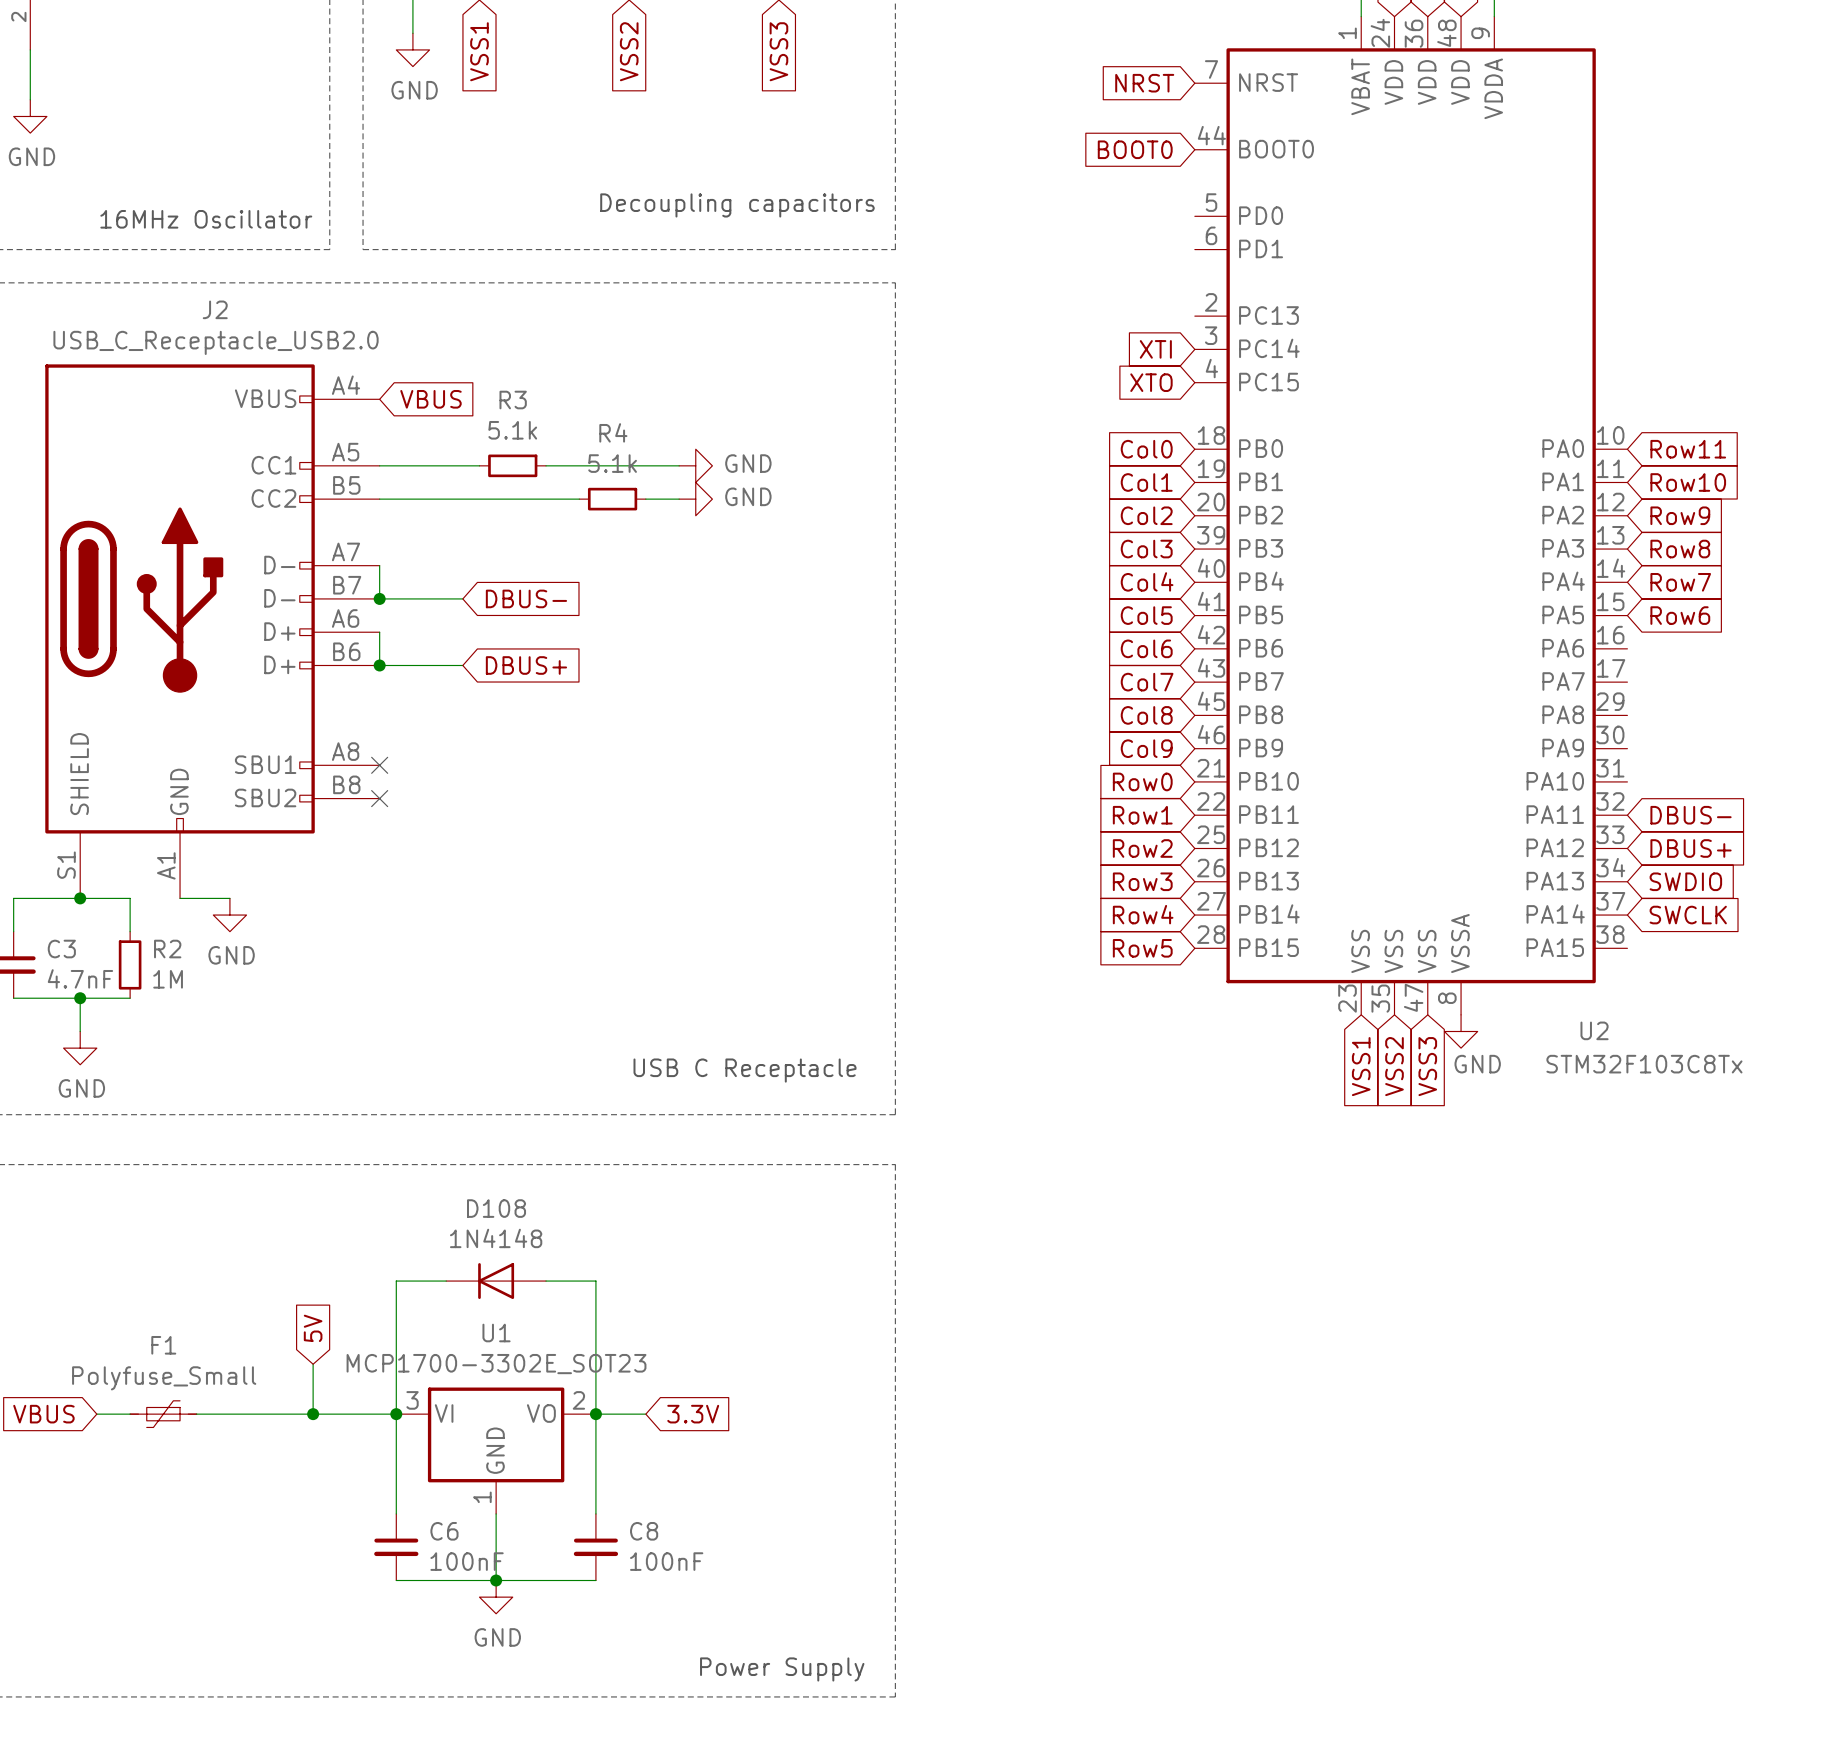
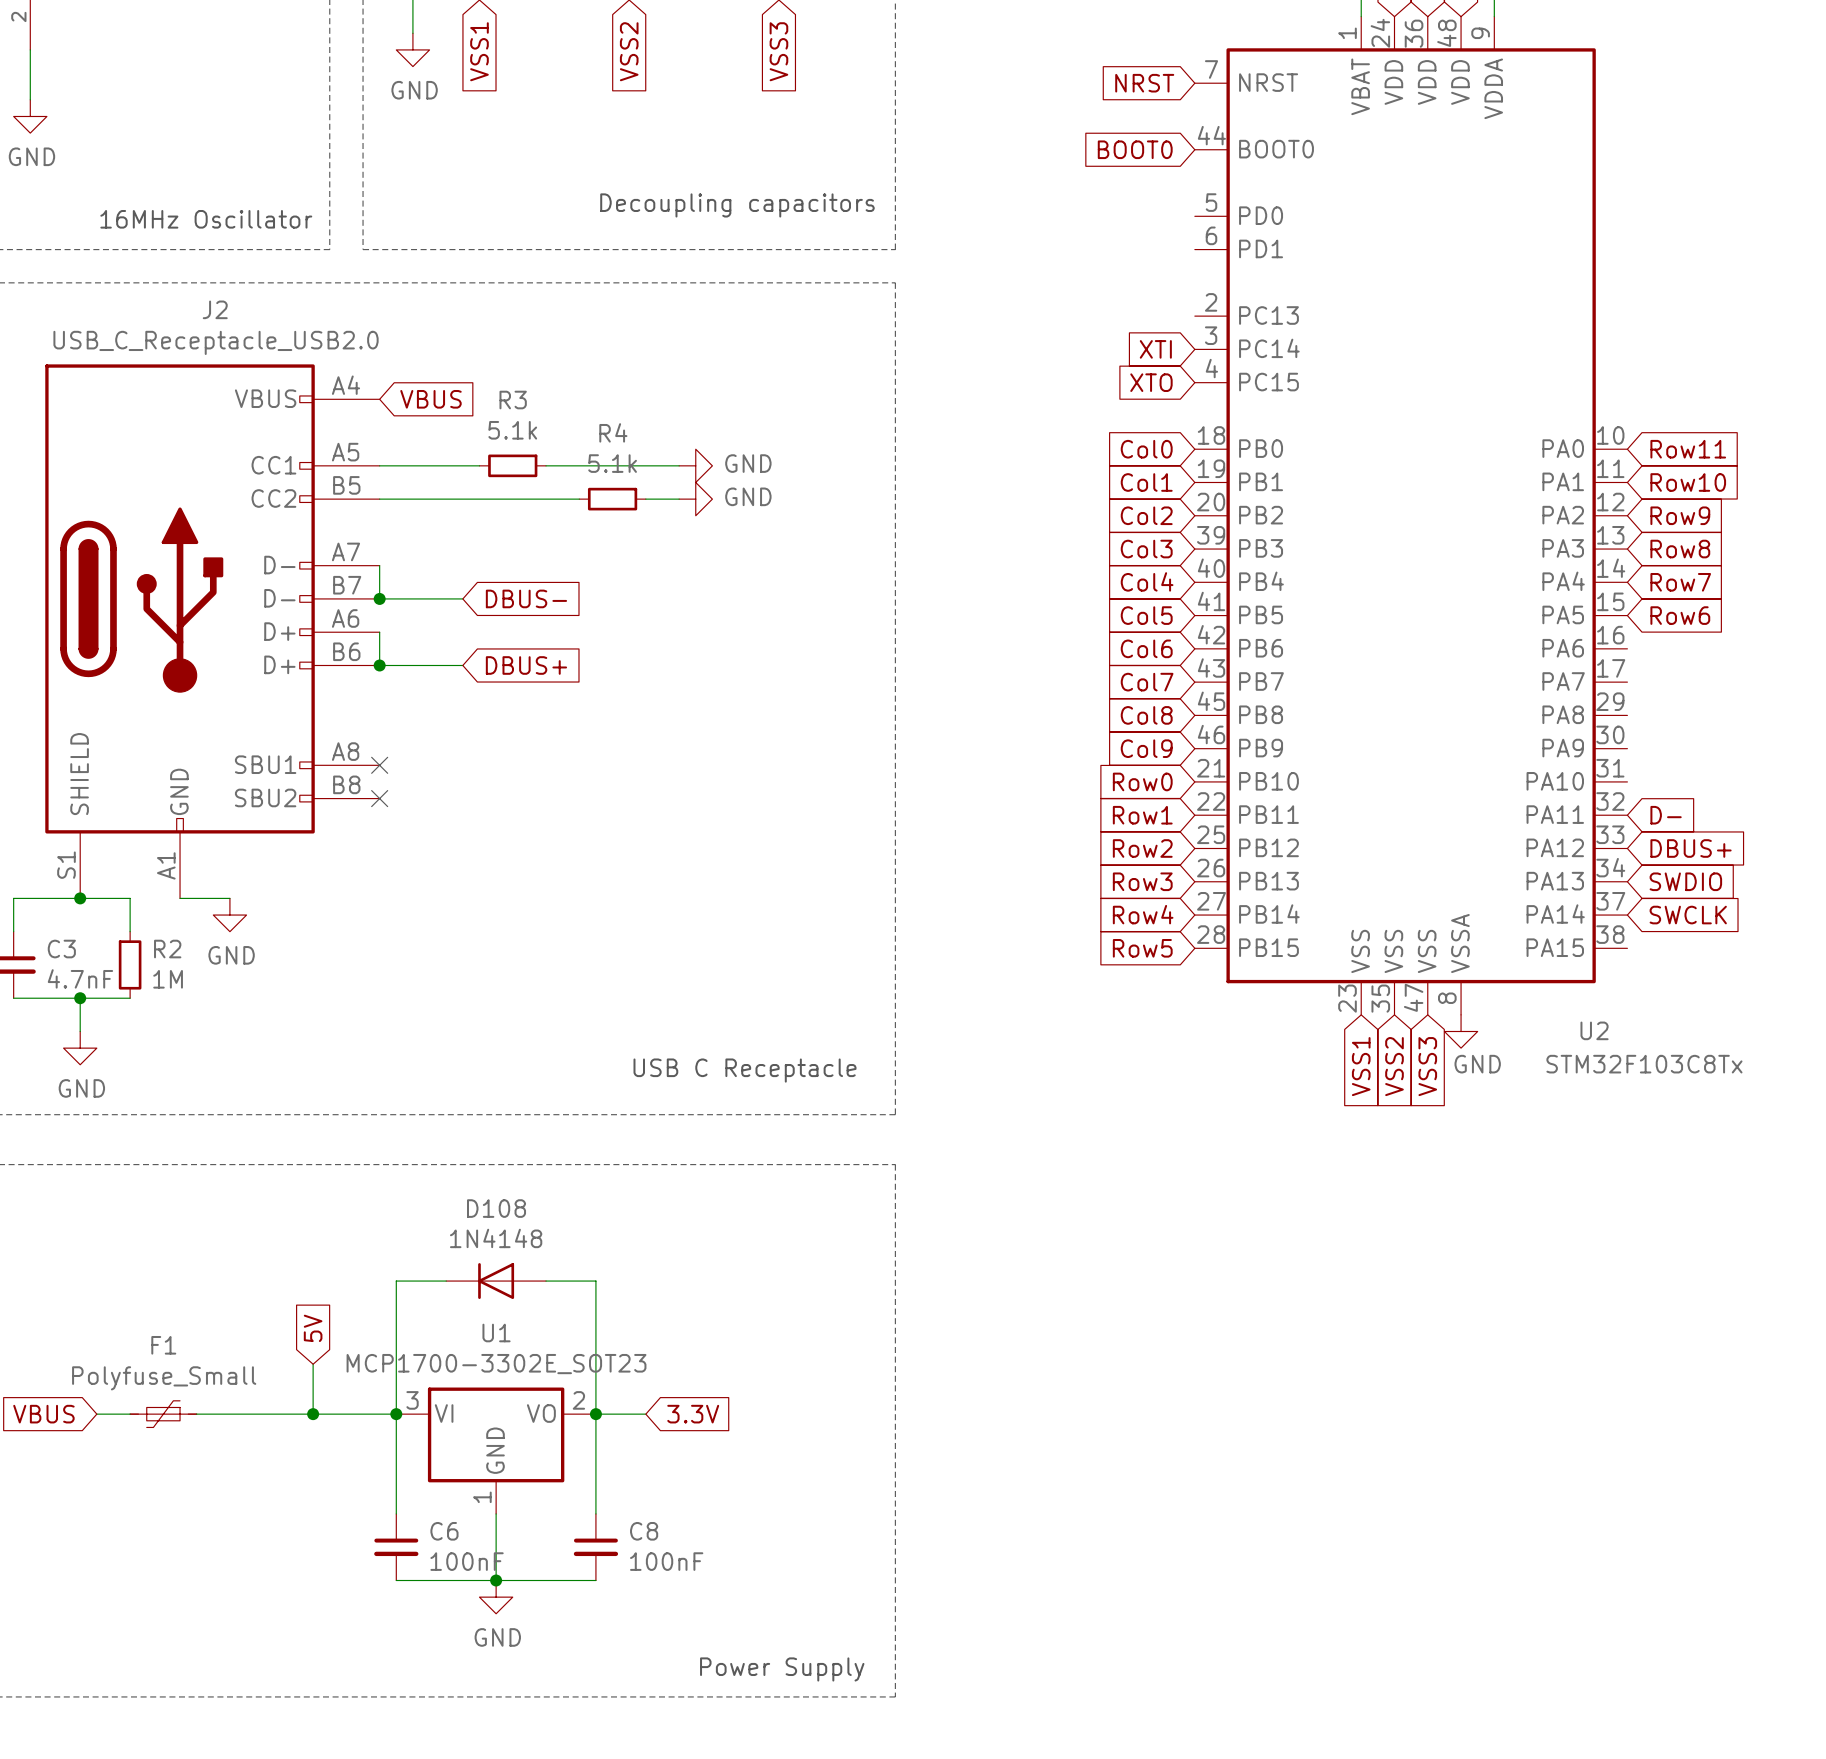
global label: DBUS- (1691, 815) -> D- (1666, 815)

